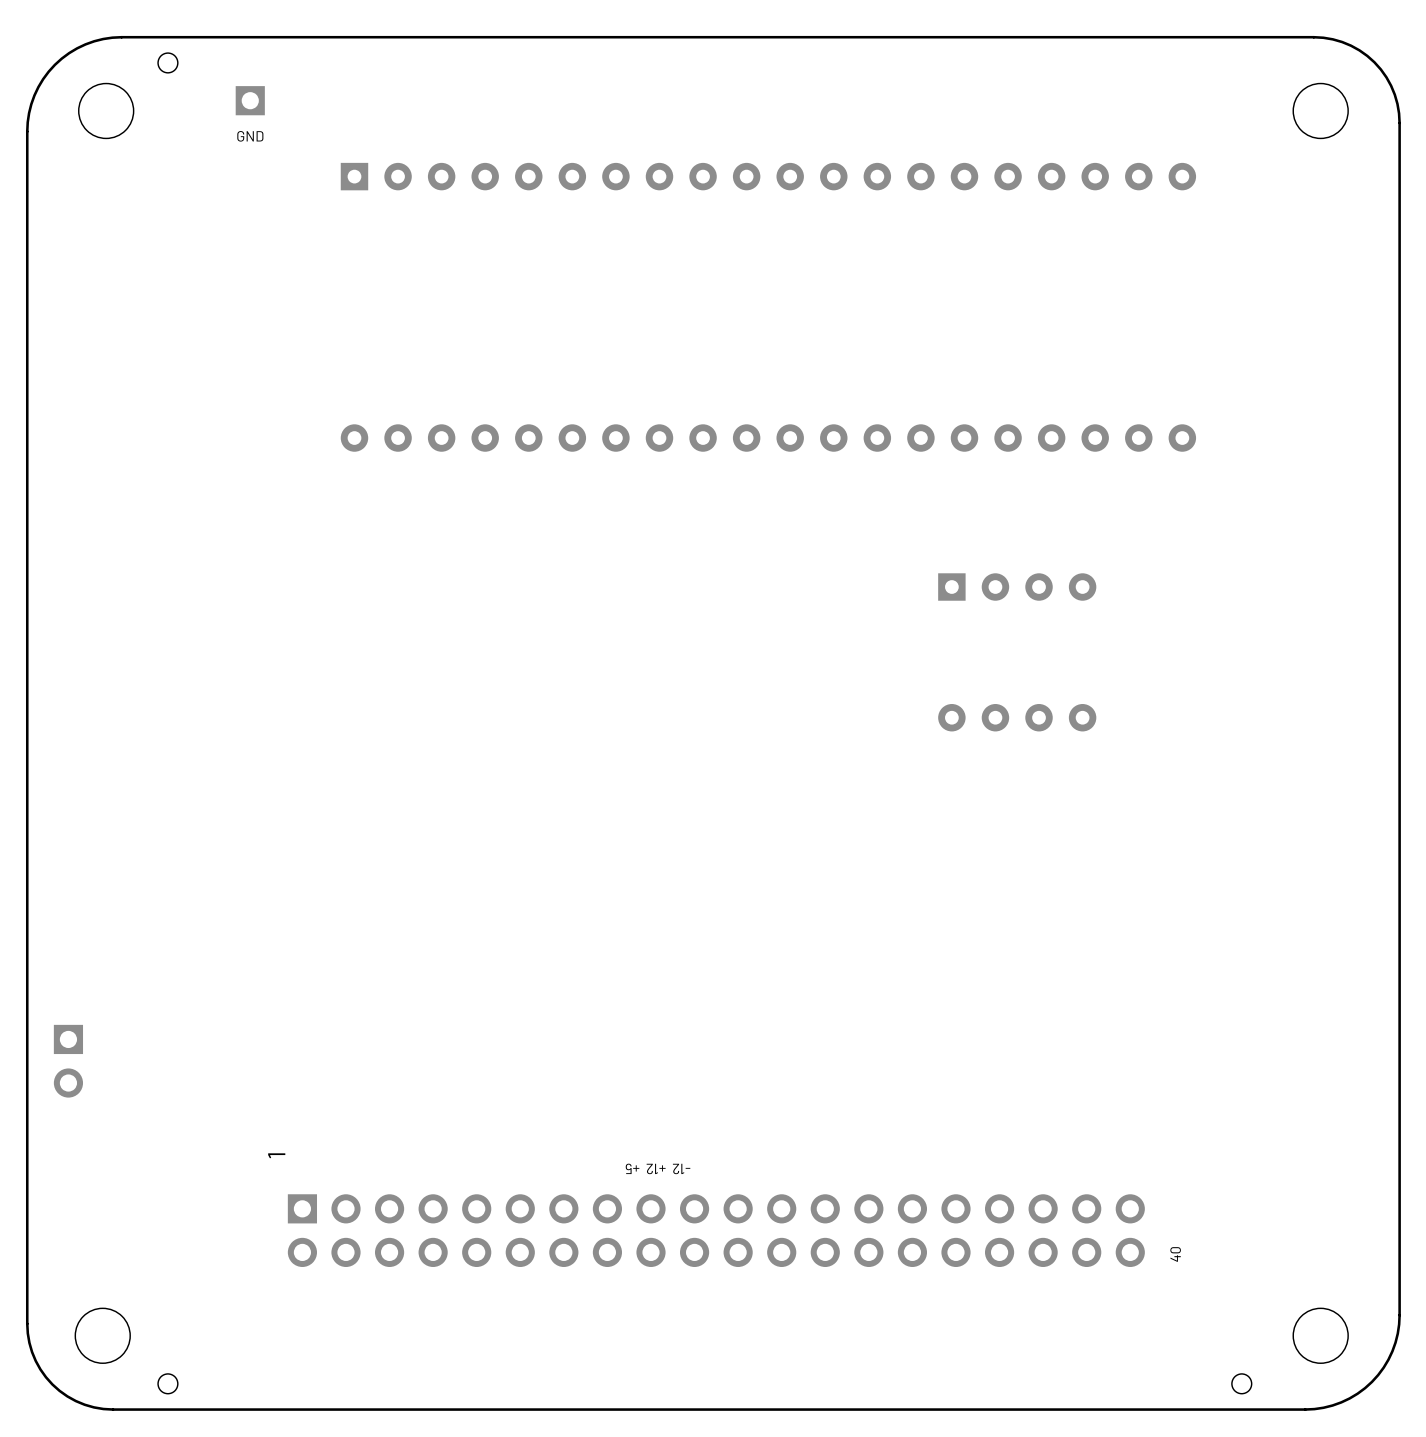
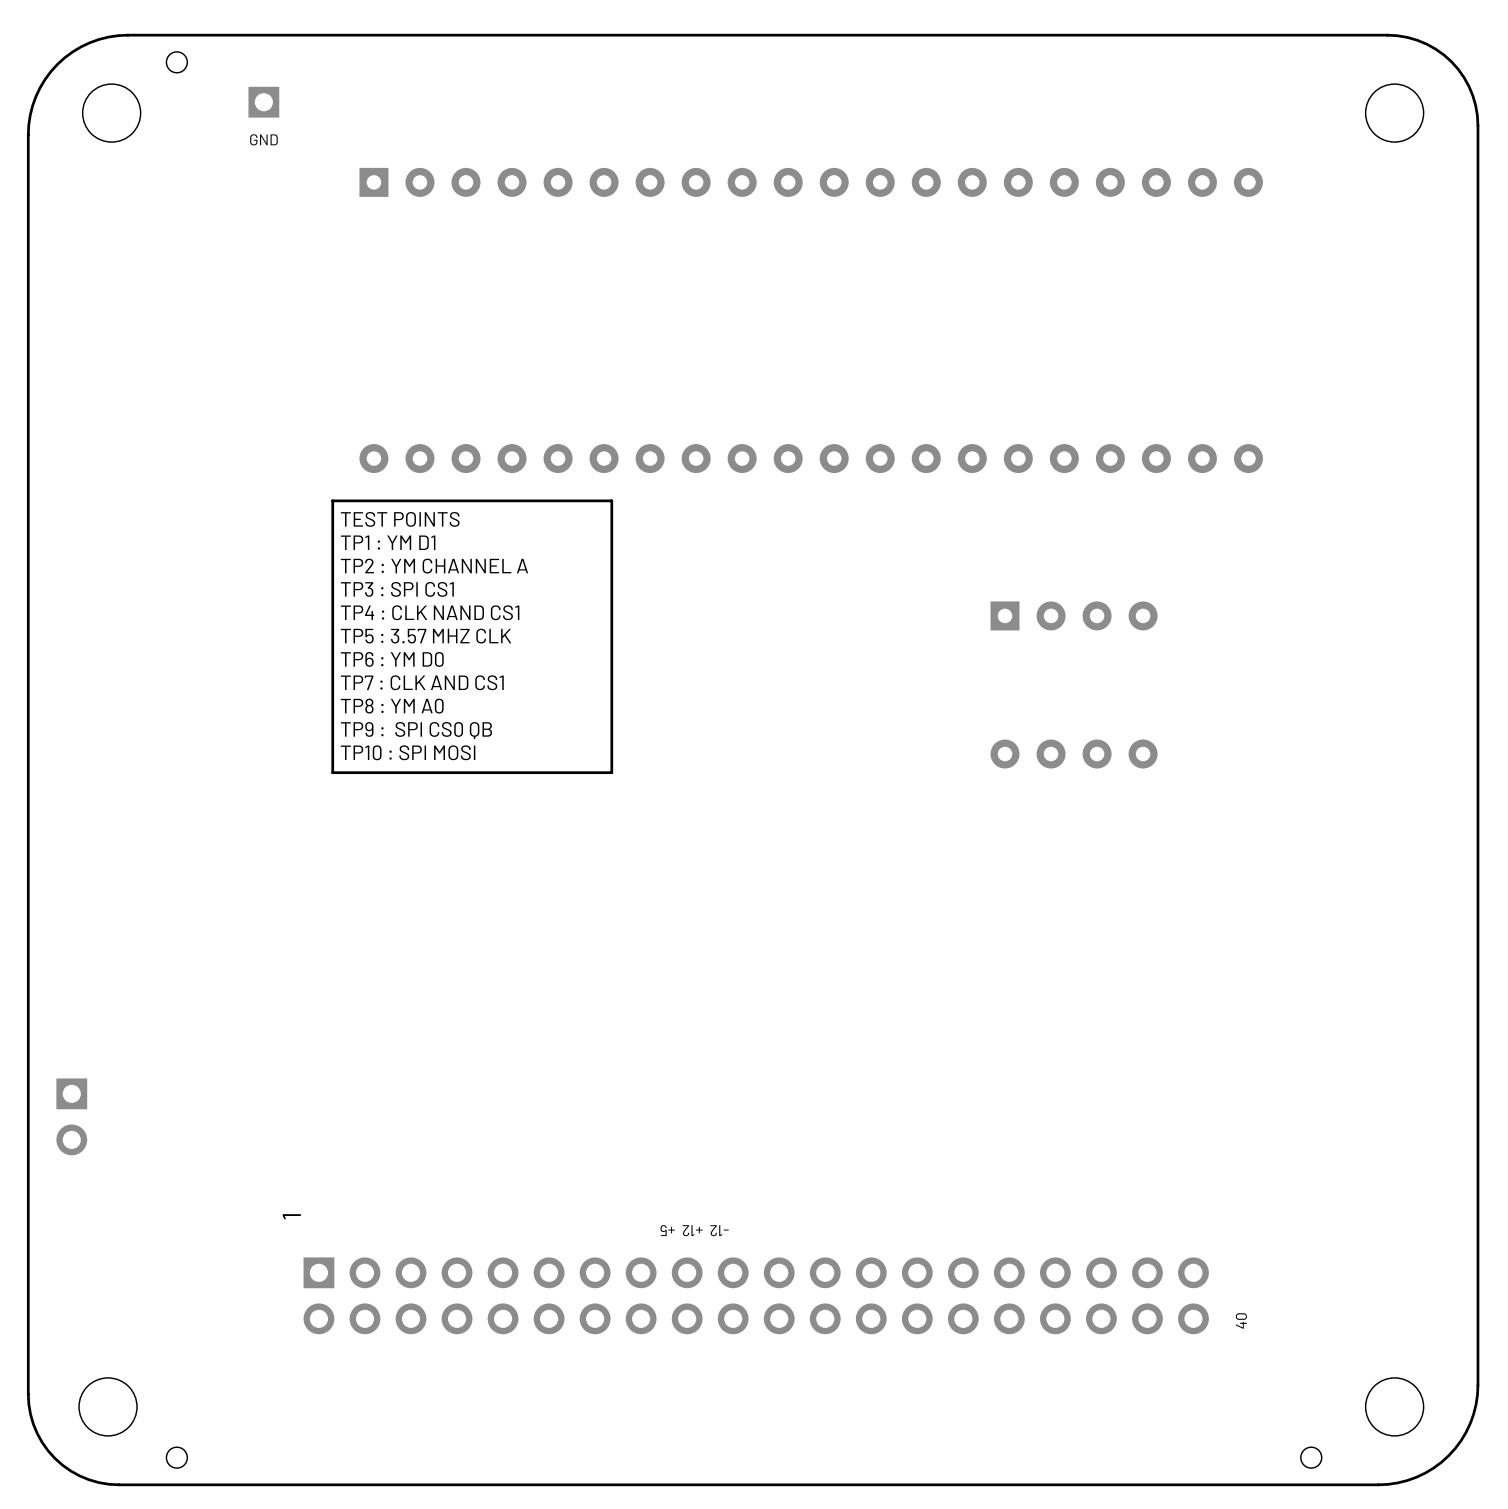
line: none -> (611, 500) (332, 500) (332, 772) (611, 772) (611, 500)
text: none -> TEST POINTS (400, 519)
text: none -> TP1 : YM D1 (388, 542)
text: none -> TP2 : YM CHANNEL A (434, 566)
text: none -> TP3 : SPI CS1 (397, 589)
text: none -> TP4 : CLK NAND CS1 (430, 612)
text: none -> TP5 : 3.57 MHZ CLK (426, 636)
text: none -> TP6 : YM D0 (392, 659)
text: none -> TP7 : CLK AND CS1 (422, 682)
text: none -> TP8 : YM A0 (392, 706)
text: none -> TP9 : SPI CS0 QB (416, 730)
text: none -> TP10 : SPI MOSI (408, 752)

